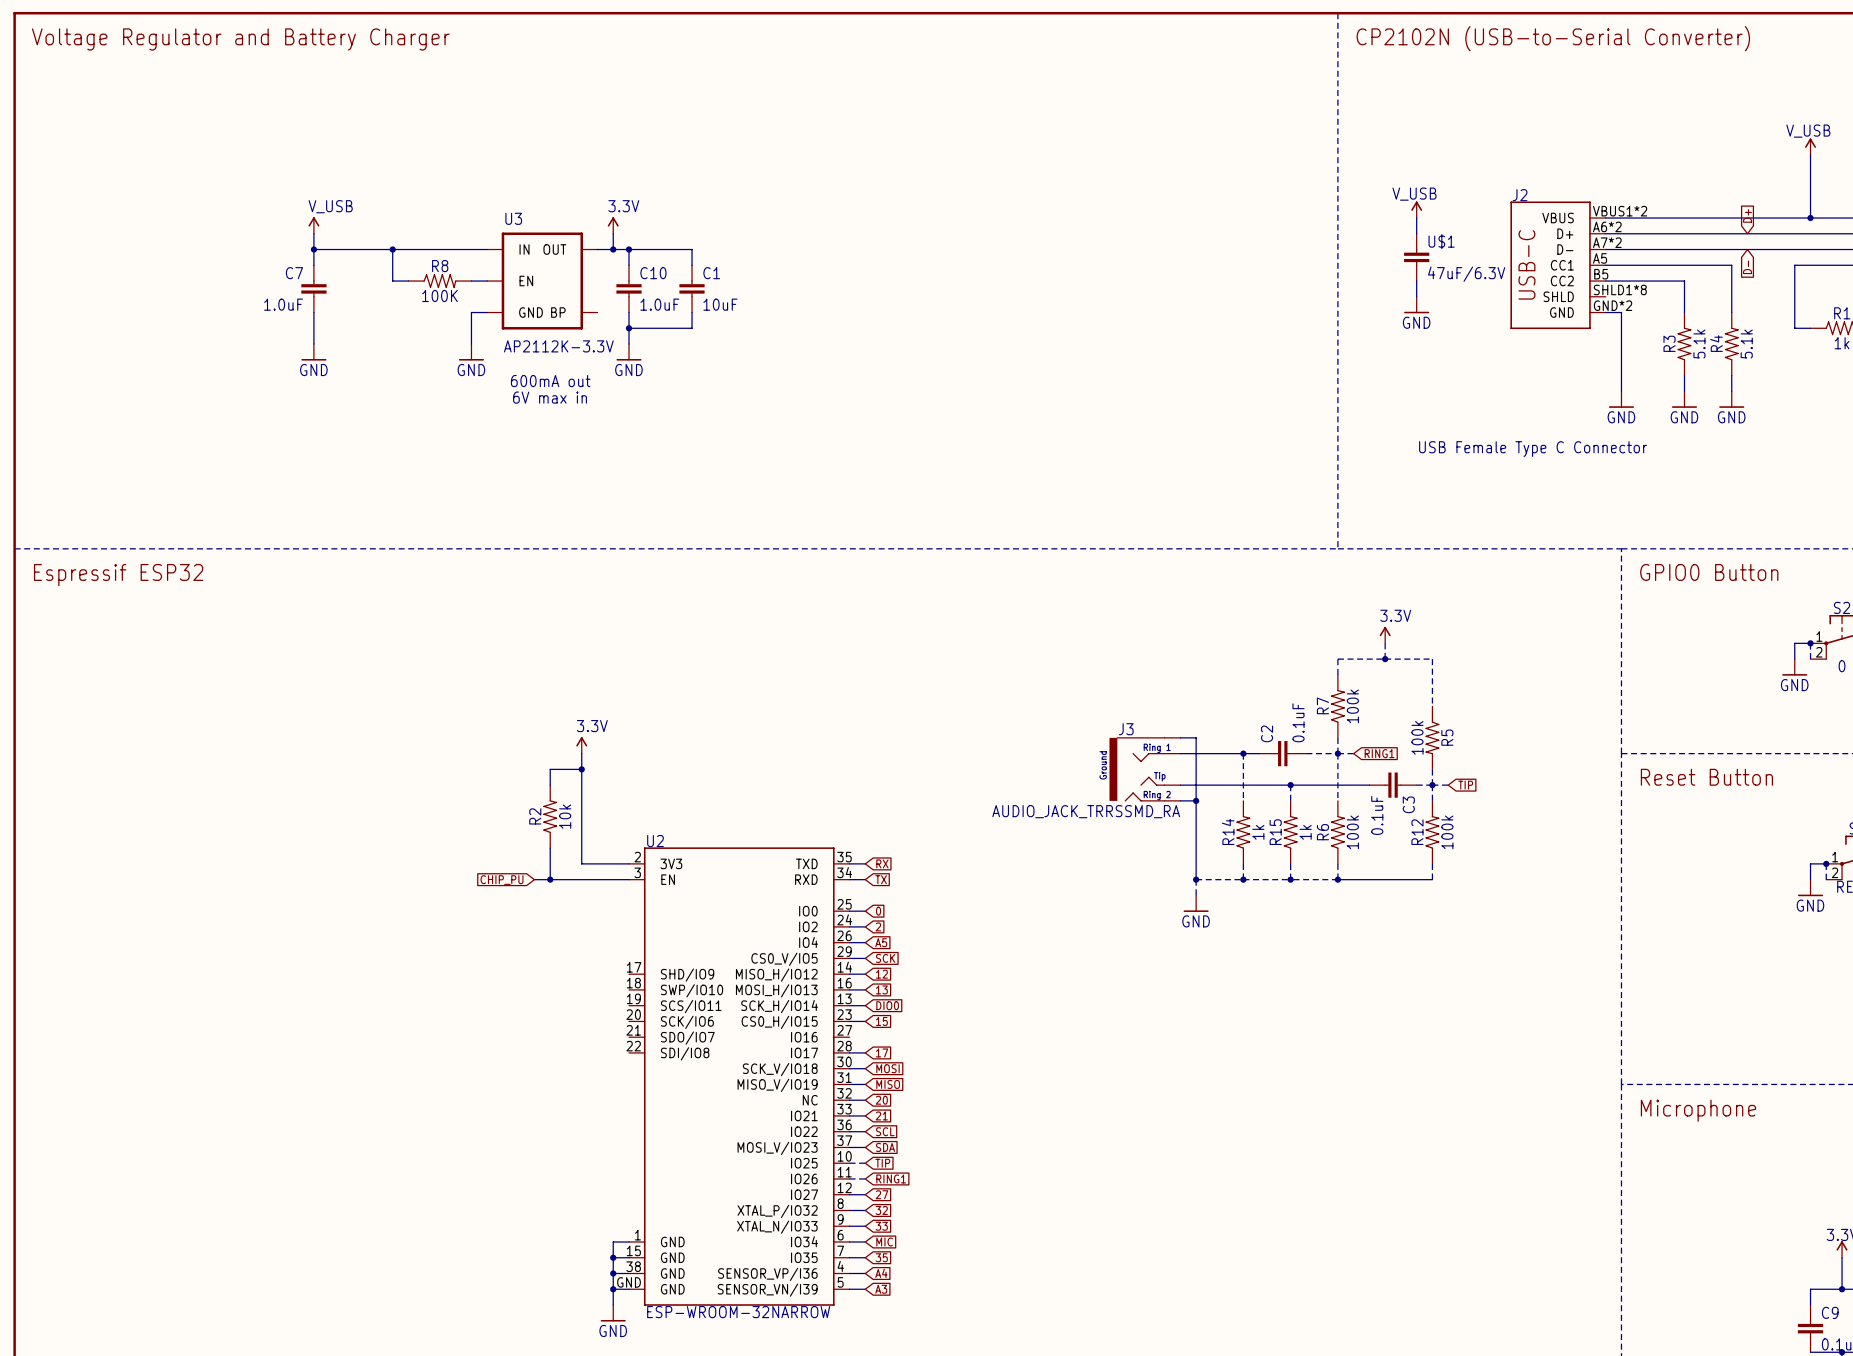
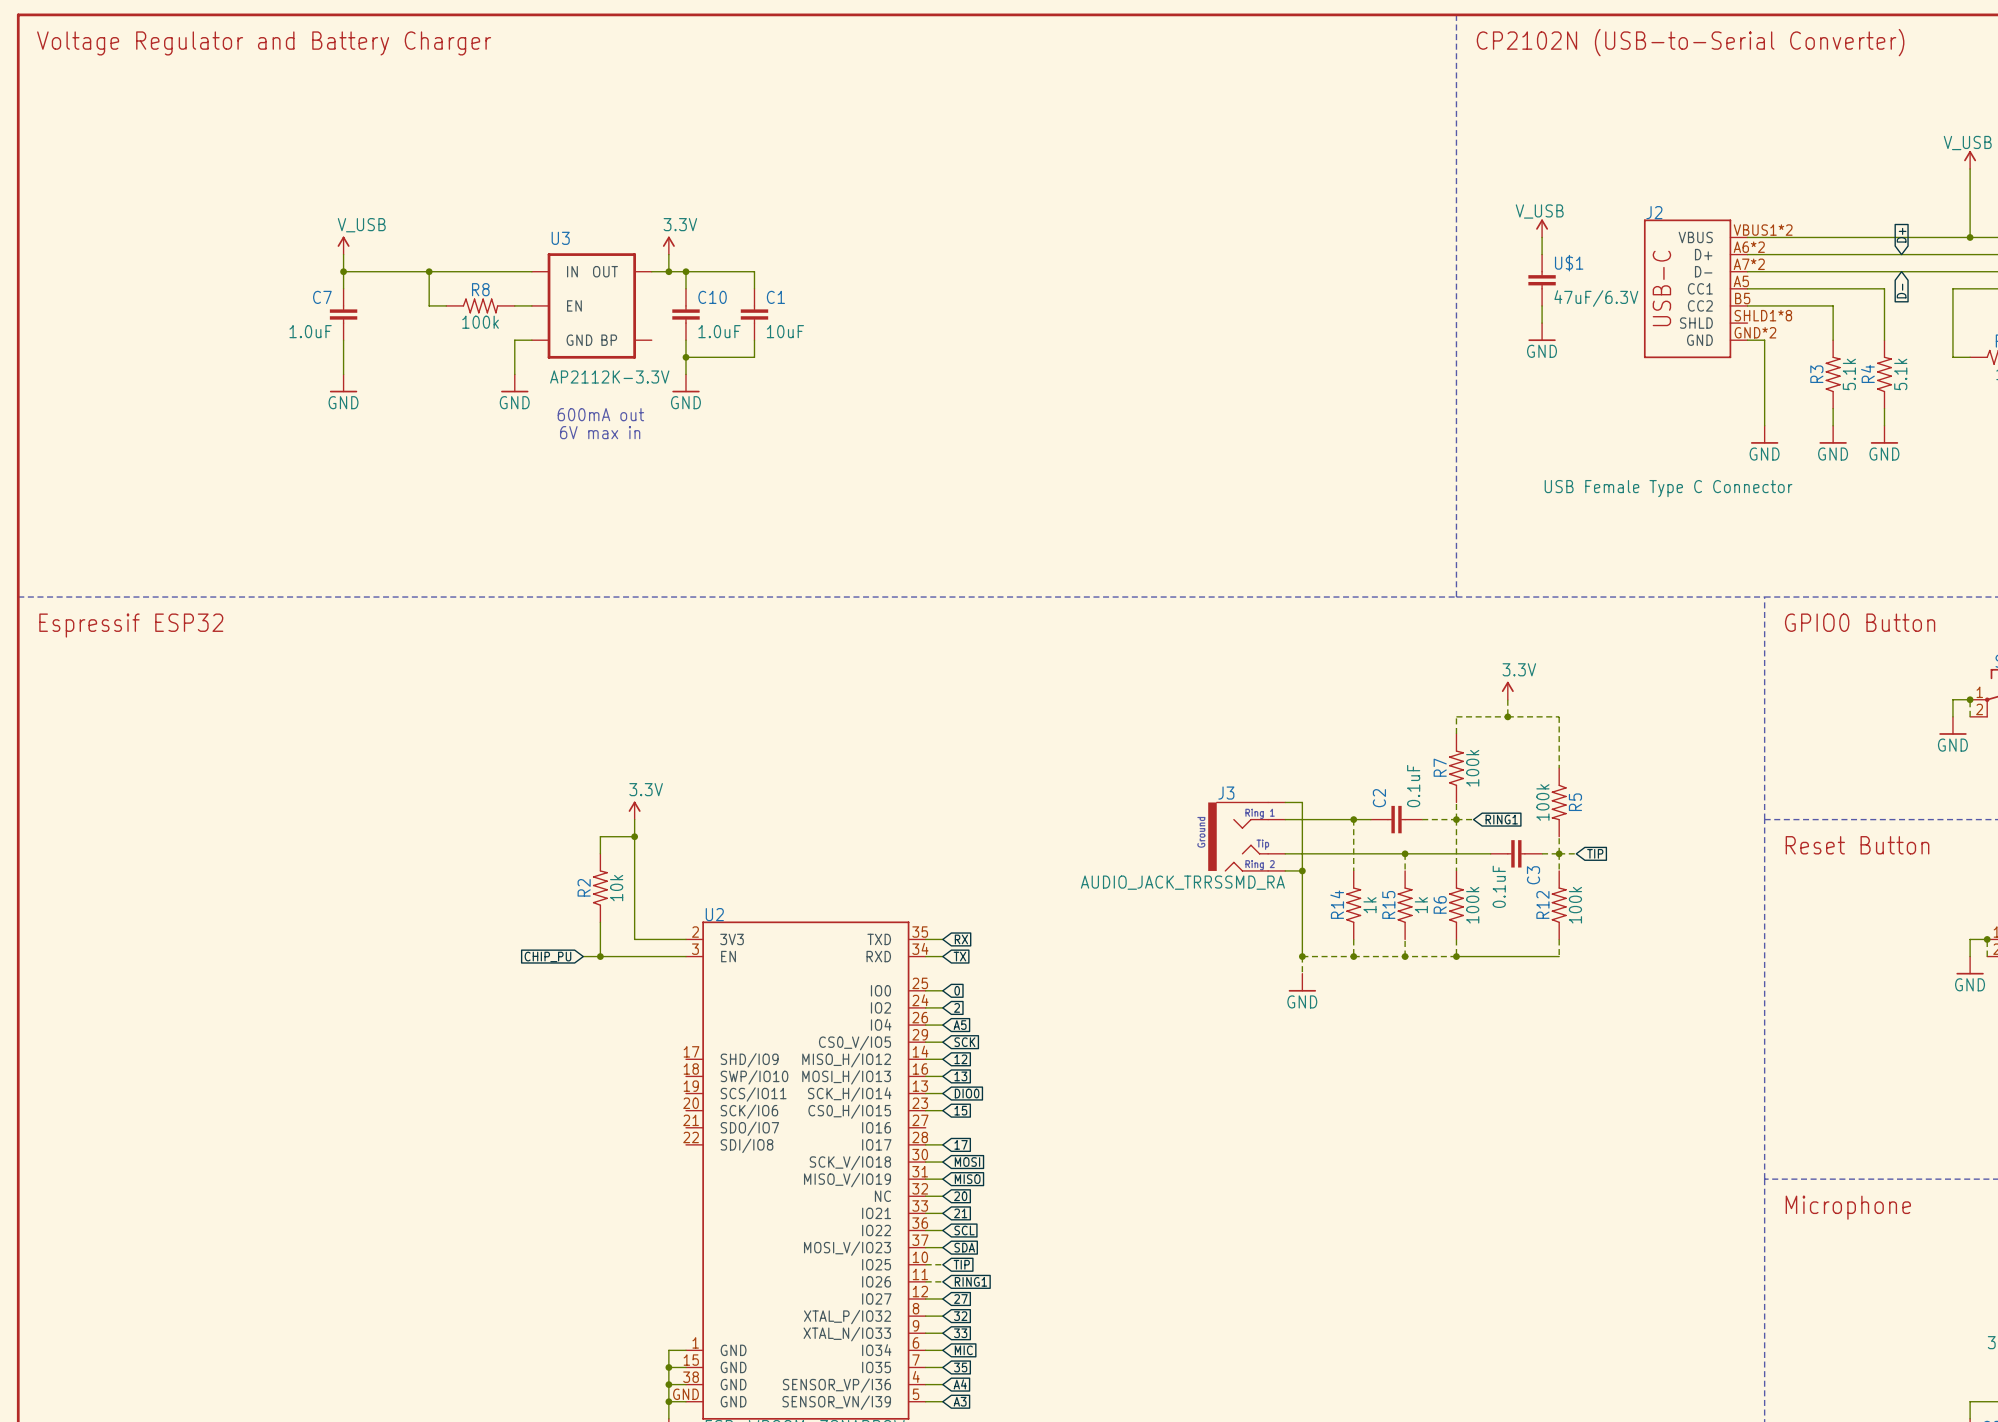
R8 value: 100K (439, 295) -> 100k (480, 322)

